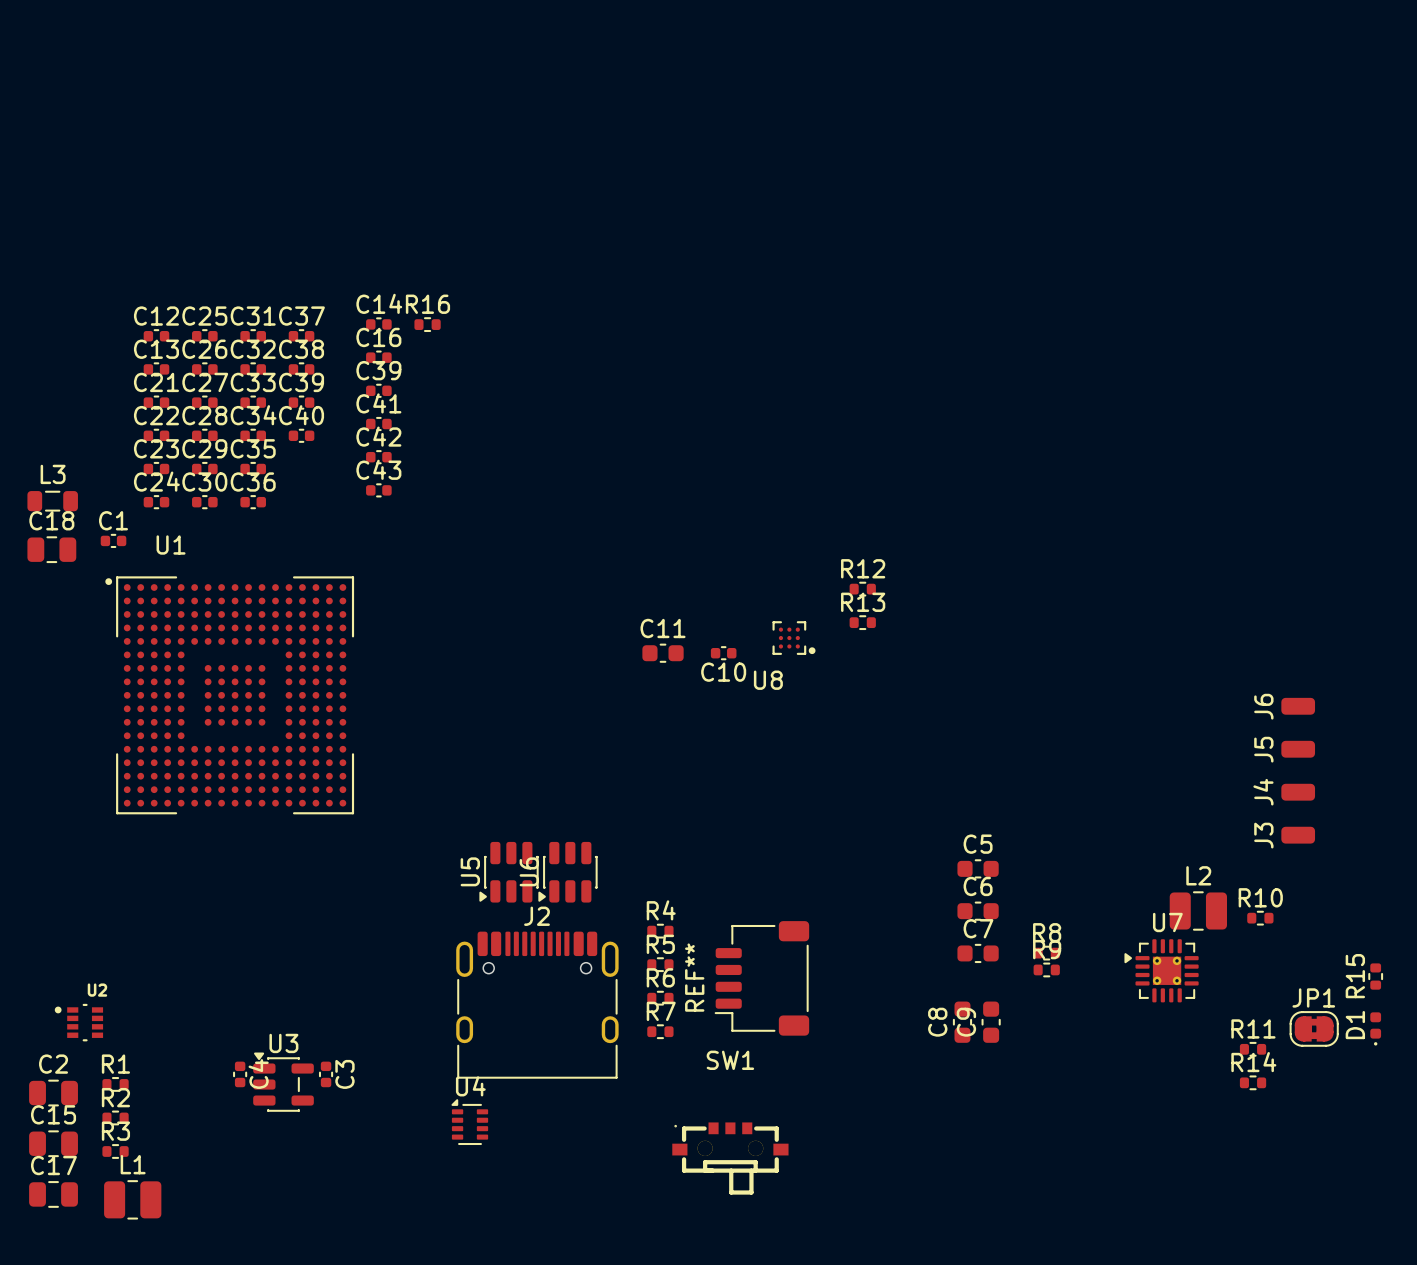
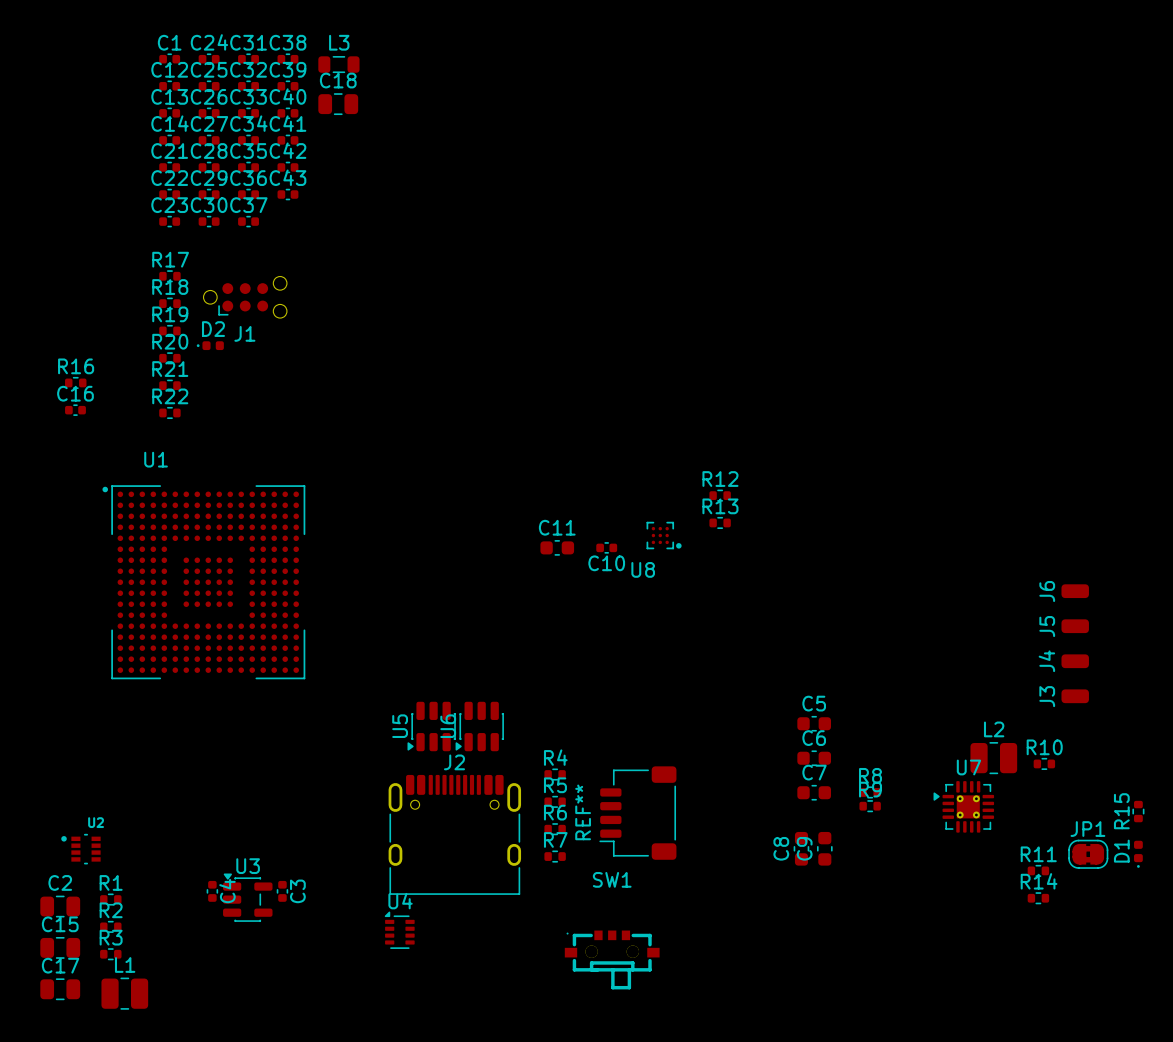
C39: none -> (287, 86)
R17: none -> (169, 276)
C14 position: (378, 324) -> (169, 140)
R16 position: (427, 324) -> (75, 382)
C12 position: (156, 336) -> (169, 86)
C25 position: (204, 336) -> (209, 86)
C31 position: (253, 336) -> (248, 59)
C37 position: (301, 336) -> (248, 221)
J1: none -> (245, 297)
R18: none -> (169, 303)
C16 position: (378, 357) -> (75, 410)
C13 position: (156, 369) -> (169, 113)
C26 position: (204, 369) -> (209, 113)
C32 position: (253, 369) -> (248, 86)
C38 position: (301, 369) -> (287, 59)
R19: none -> (169, 330)
C39: (378, 390) -> none
C21 position: (156, 402) -> (169, 167)
C27 position: (204, 402) -> (209, 140)
C33 position: (253, 402) -> (248, 113)
C39: (301, 402) -> none
D2: none -> (210, 345)
R20: none -> (169, 358)
C41 position: (378, 424) -> (287, 140)
C22 position: (156, 435) -> (169, 194)
C28 position: (204, 435) -> (209, 167)
C34 position: (253, 435) -> (248, 140)
C40 position: (301, 435) -> (287, 113)
R21: none -> (169, 385)
C42 position: (378, 457) -> (287, 167)
C23 position: (156, 468) -> (169, 221)
C29 position: (204, 468) -> (209, 194)
C35 position: (253, 468) -> (248, 167)
R22: none -> (169, 412)
C43 position: (378, 490) -> (287, 194)
L3 position: (52, 501) -> (338, 64)
C24 position: (156, 502) -> (209, 59)
C30 position: (204, 502) -> (209, 221)
C36 position: (253, 502) -> (248, 194)
C1 position: (113, 540) -> (169, 59)
C18 position: (51, 549) -> (338, 104)

